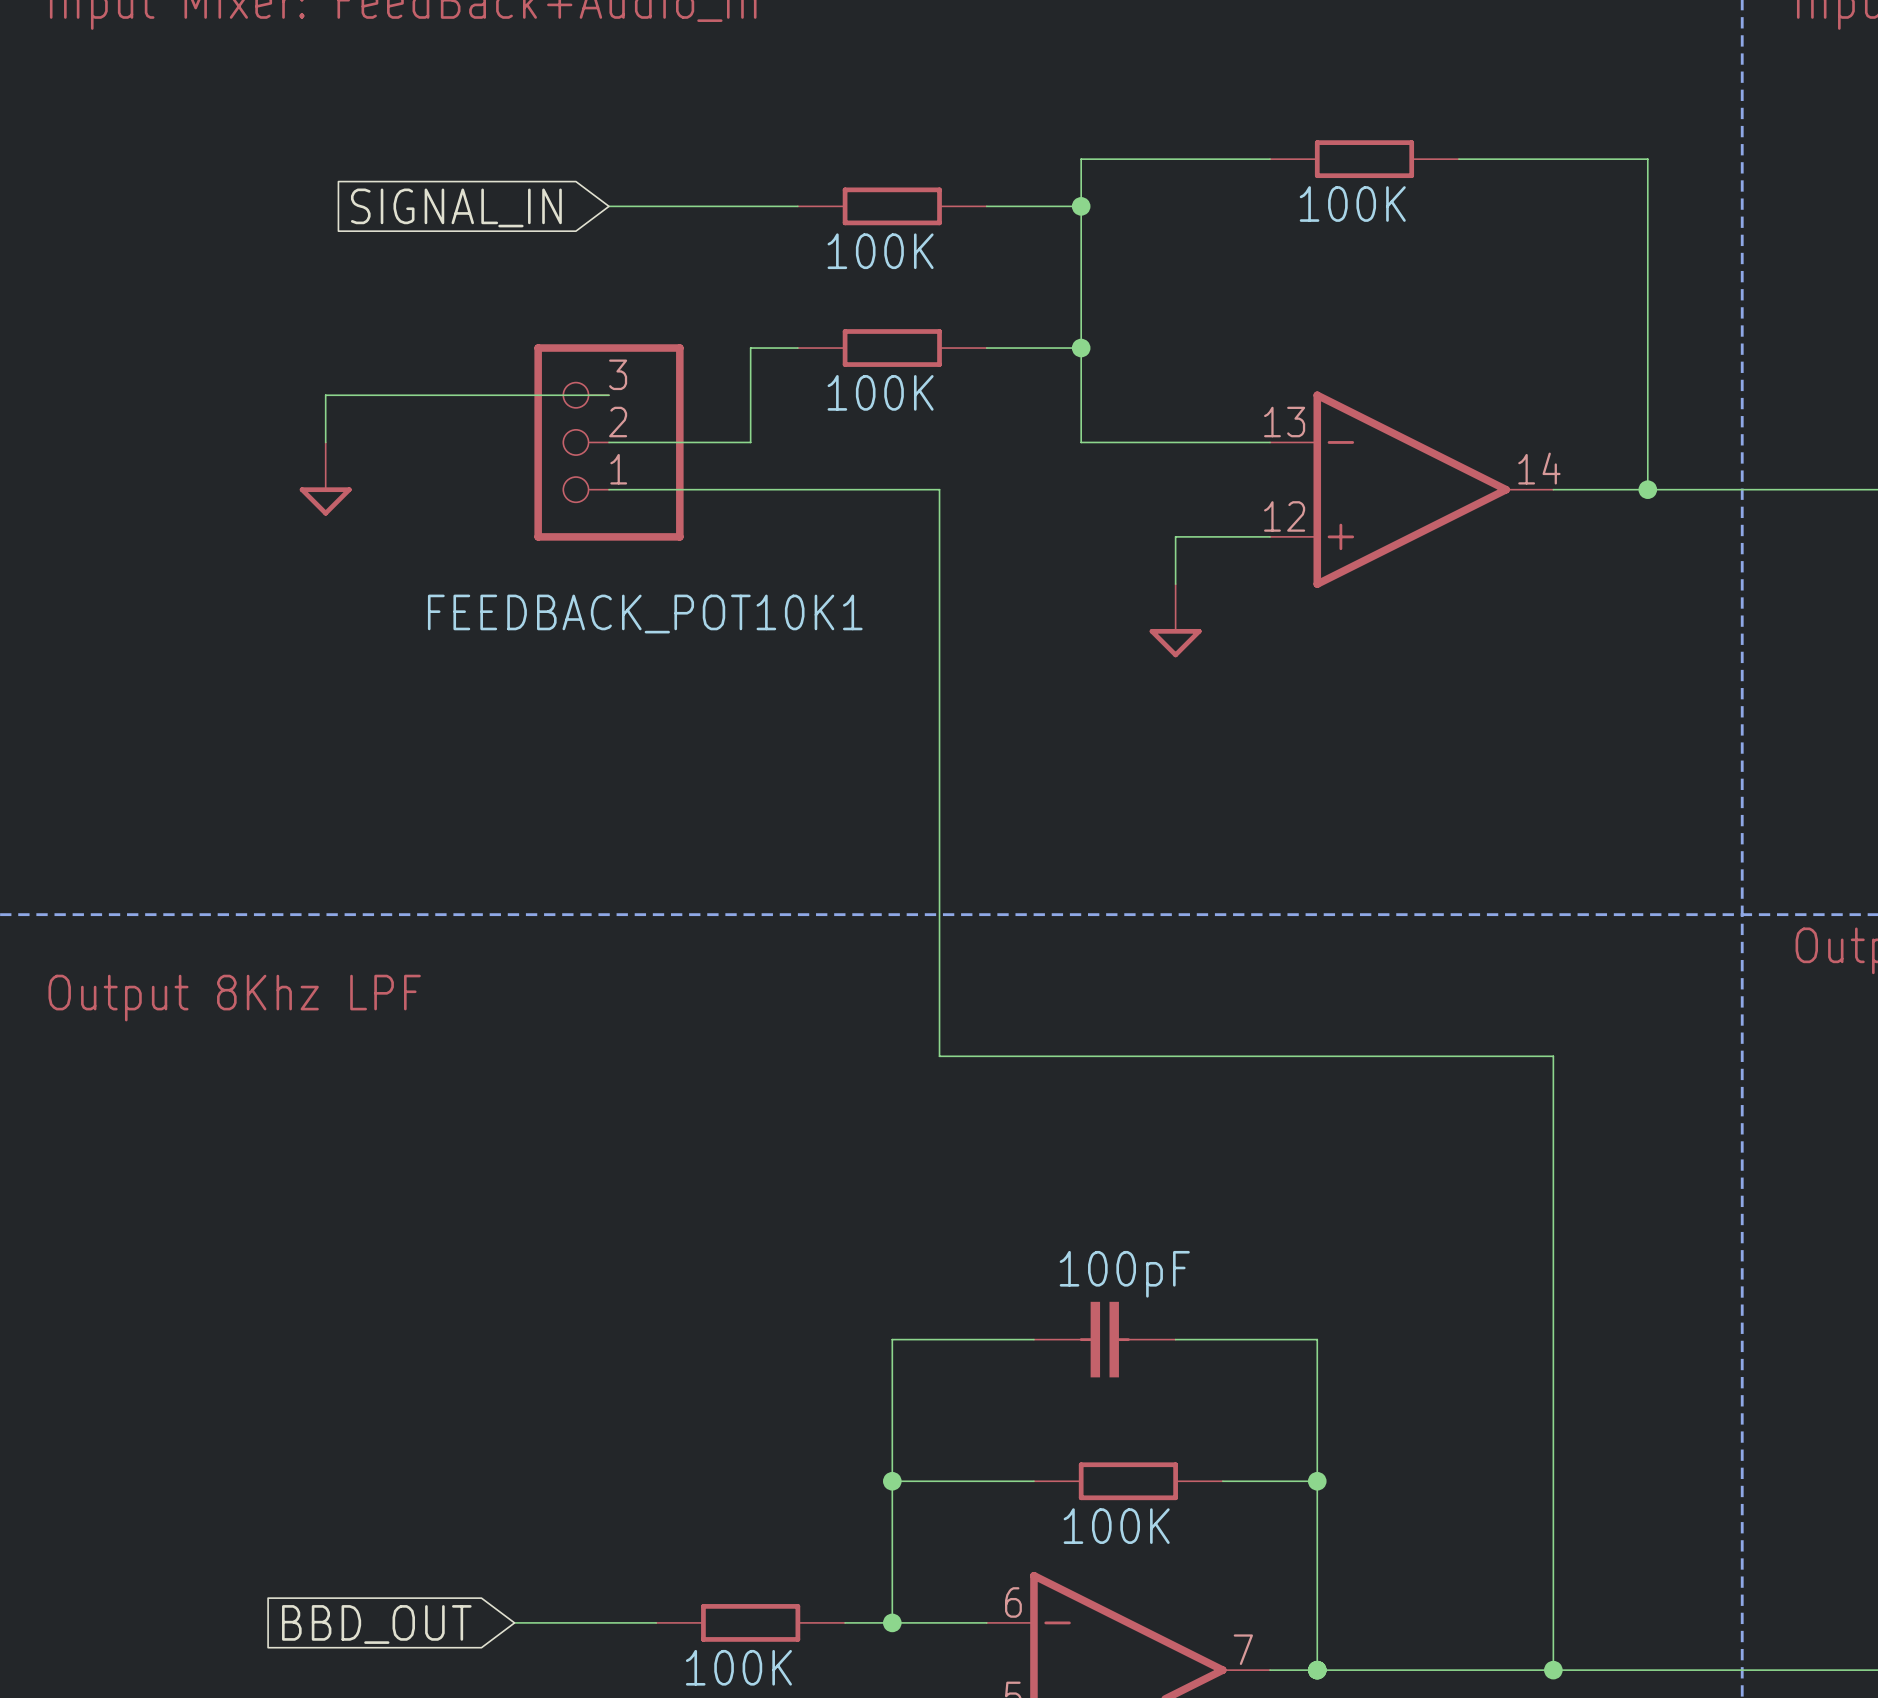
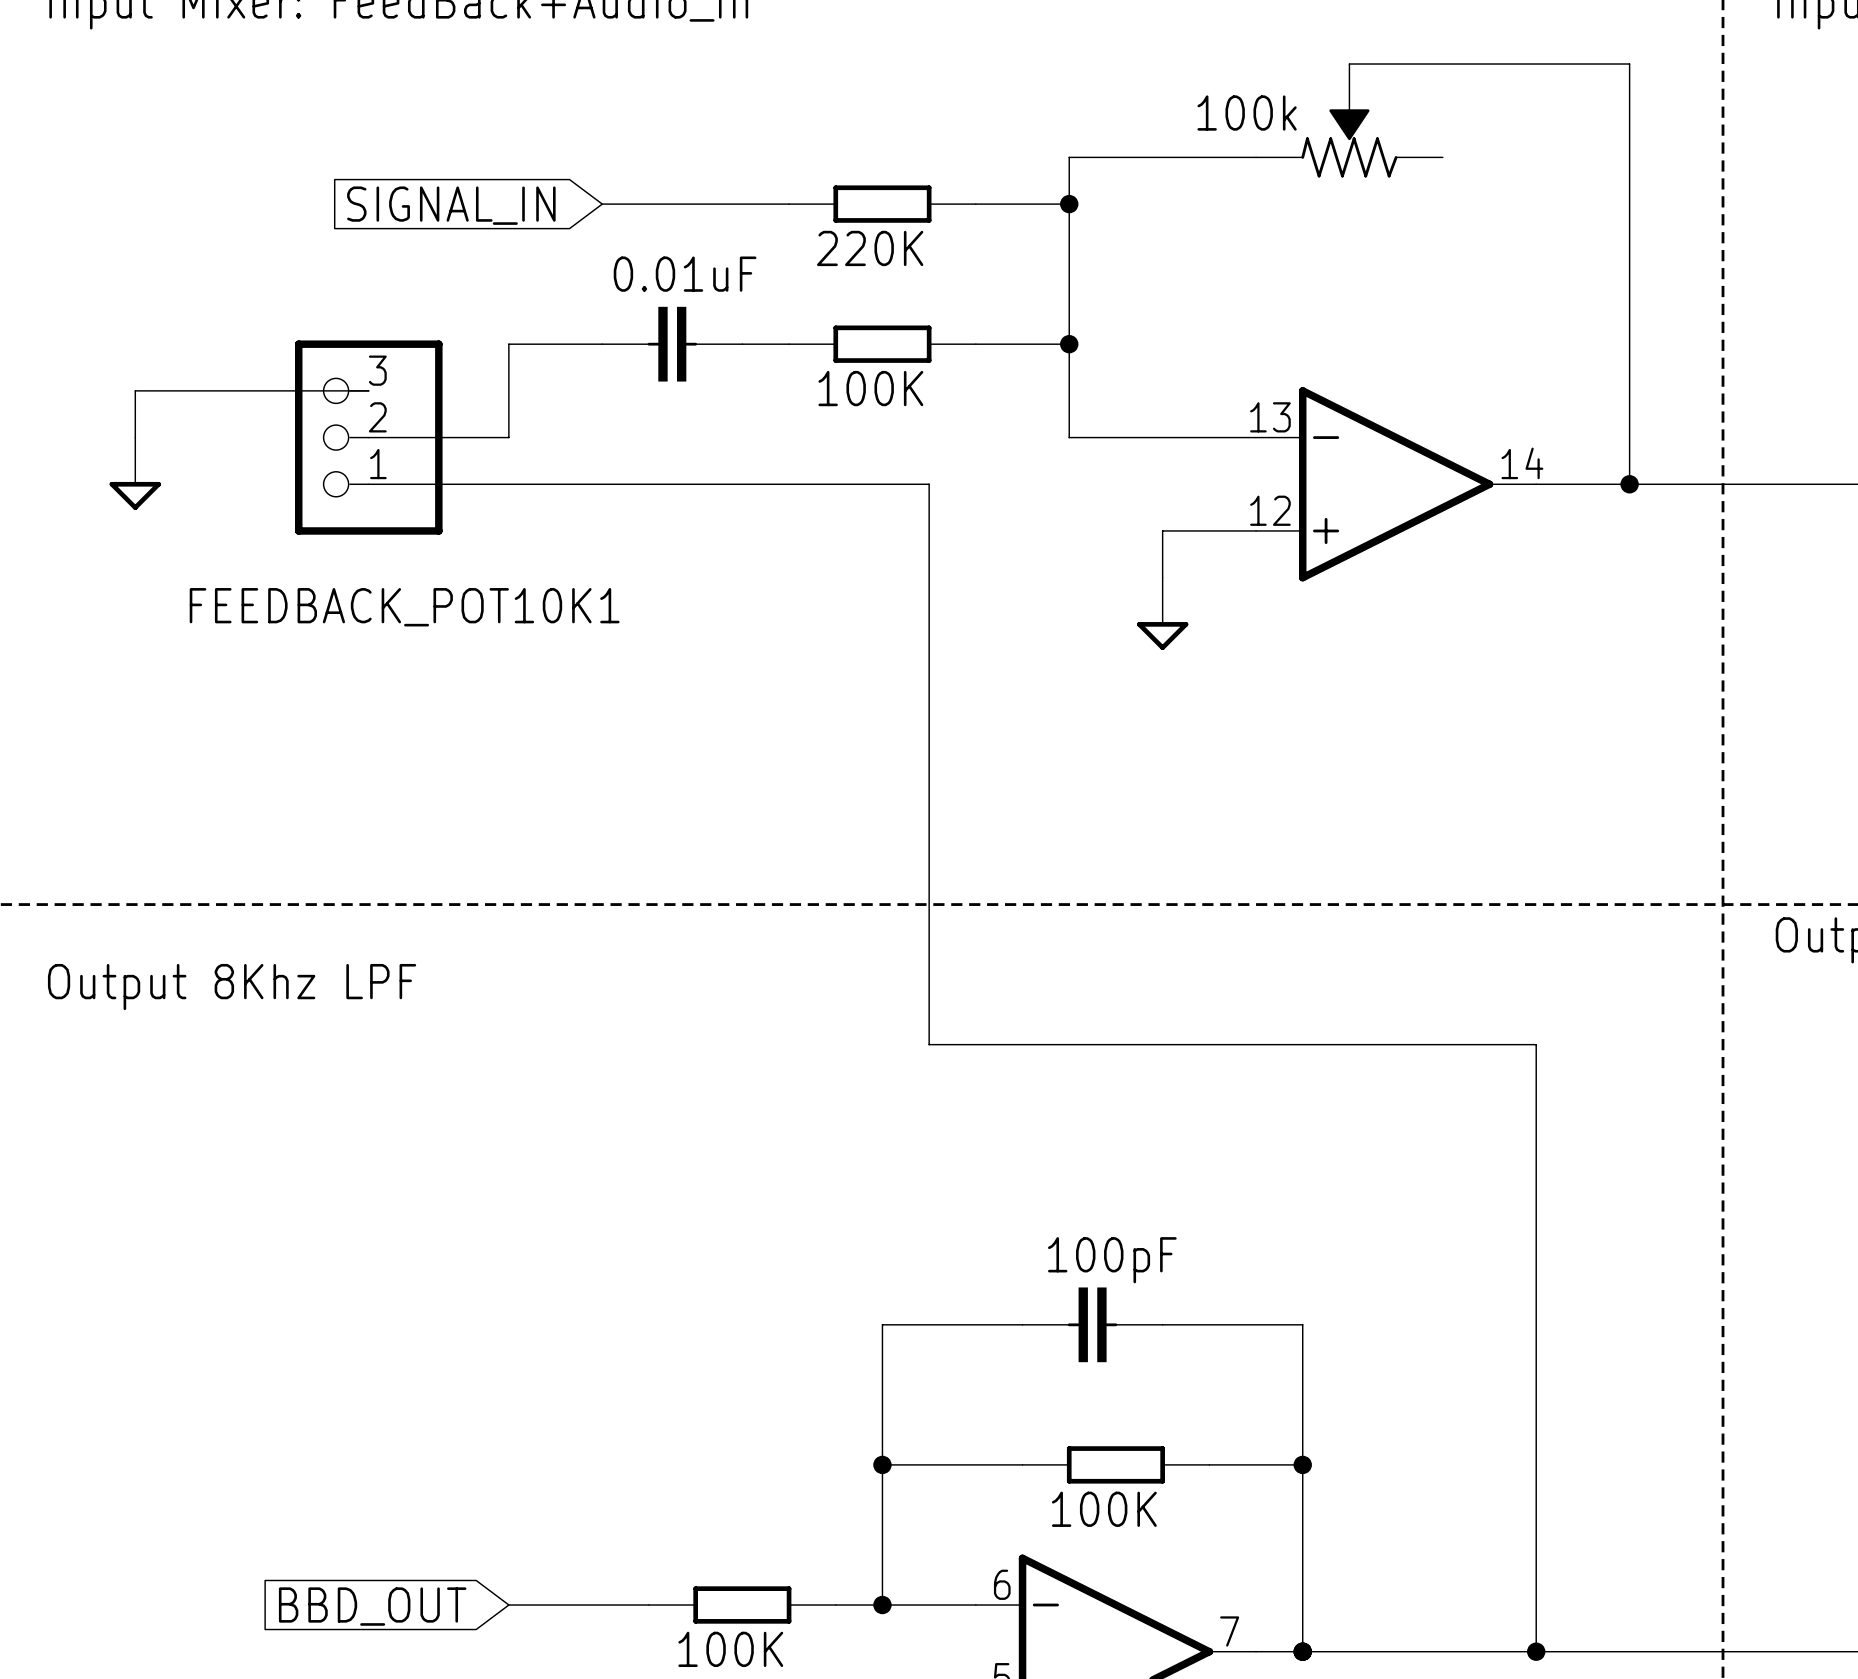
part: none -> 100k (1349, 120)
part: 100K (1364, 159) -> none
wire: (1458, 159) (1647, 159) -> (1349, 64) (1629, 64) (1629, 157)
part value: 100K (880, 251) -> 220K (870, 248)
wire: none -> (602, 344) (508, 344) (508, 437) (368, 437)
part: none -> 0.01uF (672, 344)
wire: (750, 348) (750, 442) (608, 442) -> none
wire: (325, 395) (325, 442) -> (322, 390) (135, 390) (135, 437)
wire: (372, 395) (608, 395) -> (368, 484) (602, 484)
FEEDBACK_POT10K1 position: (608, 442) -> (368, 437)
power symbol position: (325, 479) -> (135, 473)

